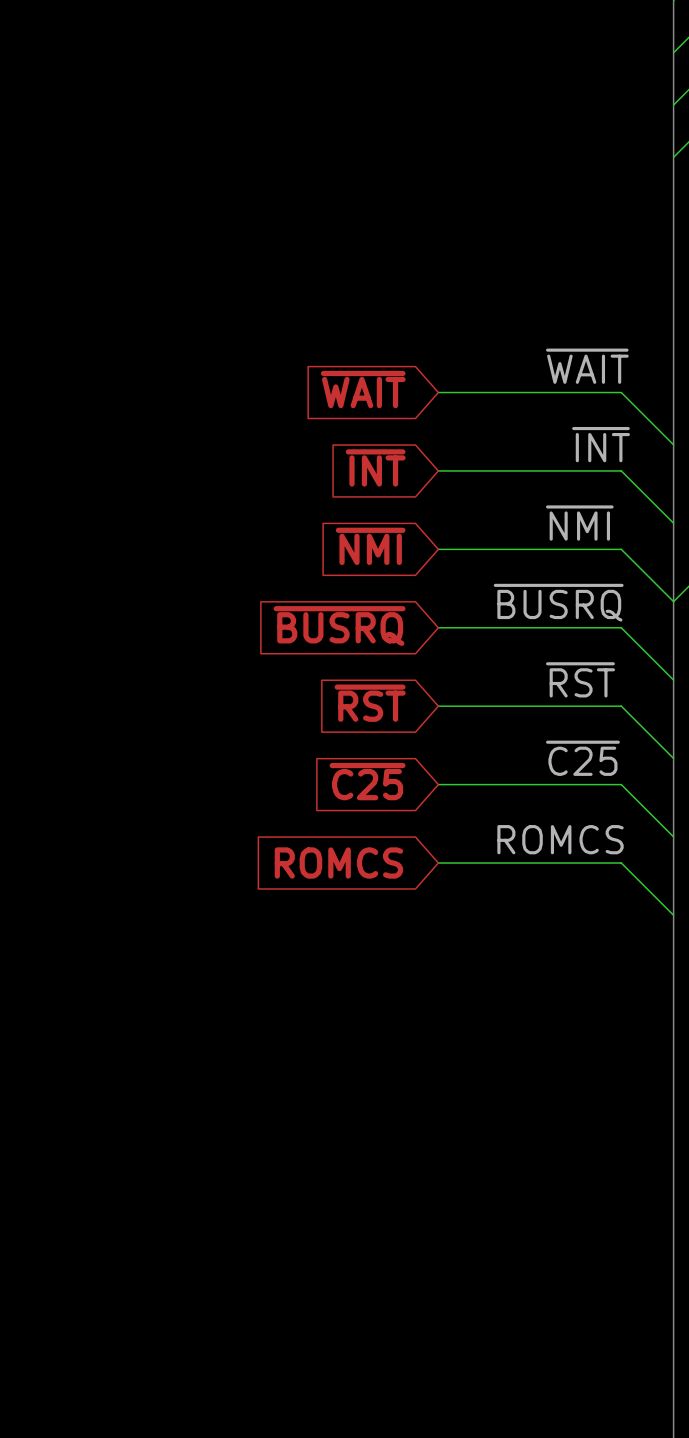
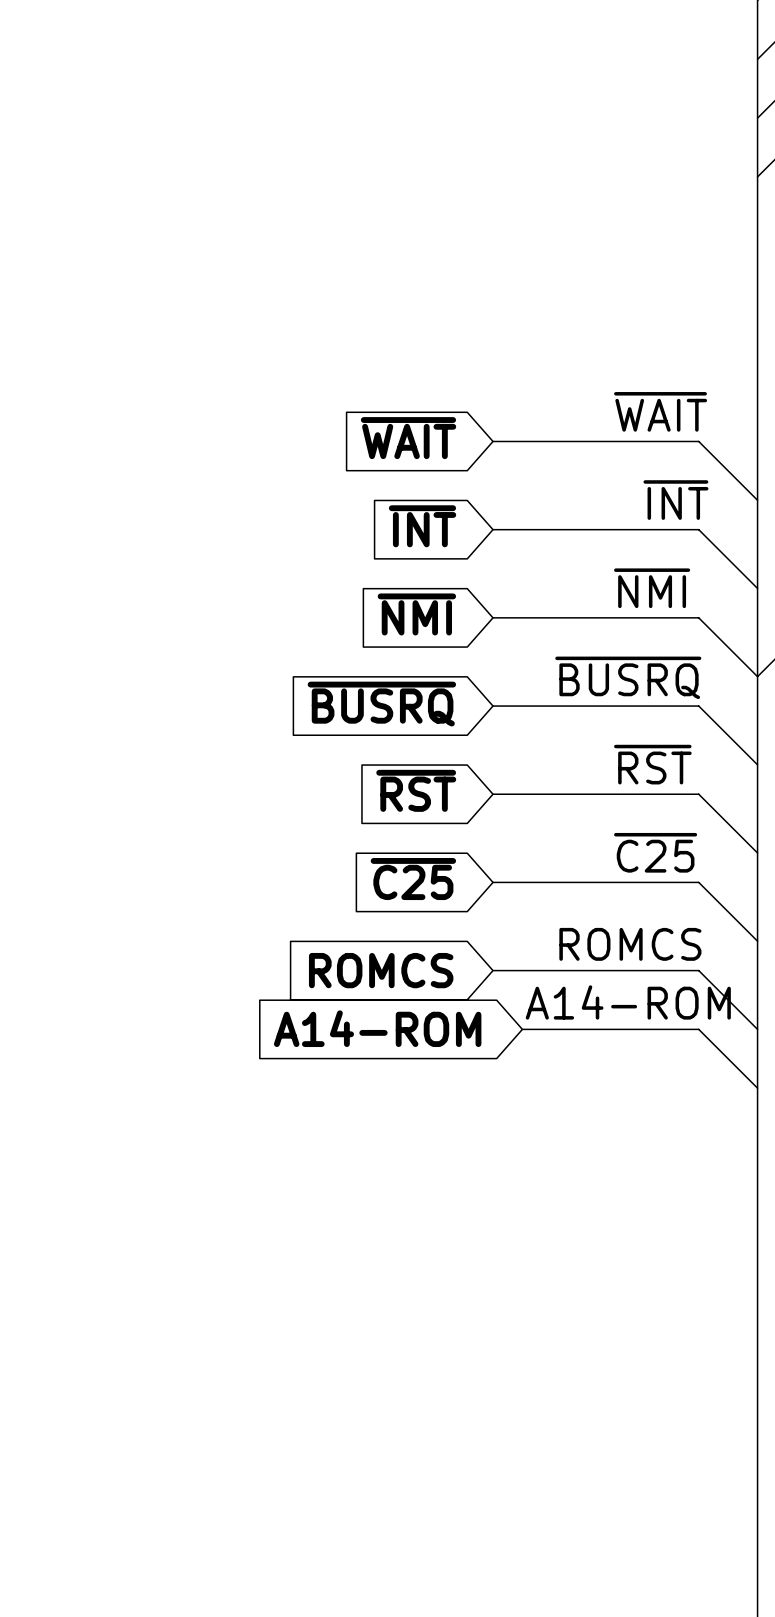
label: none -> A14-ROM (628, 1002)
global label: none -> A14-ROM (377, 1028)
wire: none -> (522, 1029) (698, 1029) (757, 1088)

